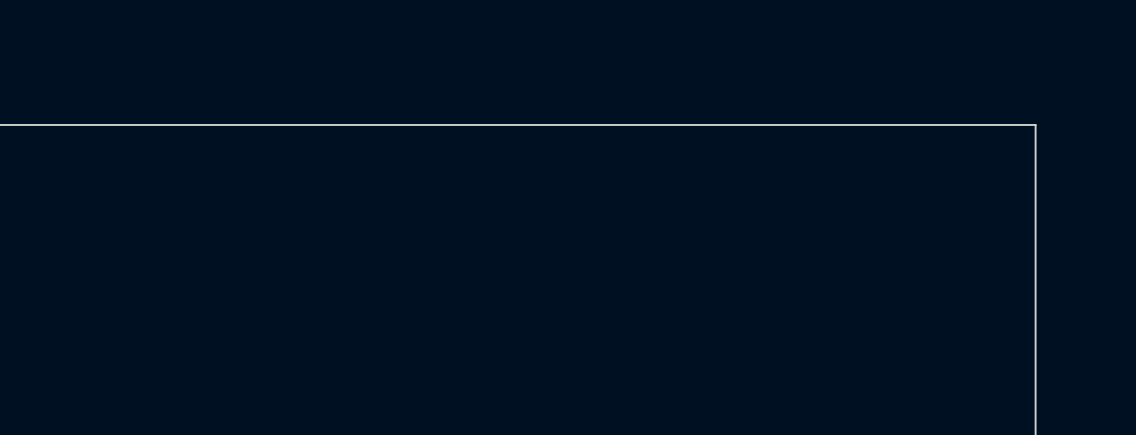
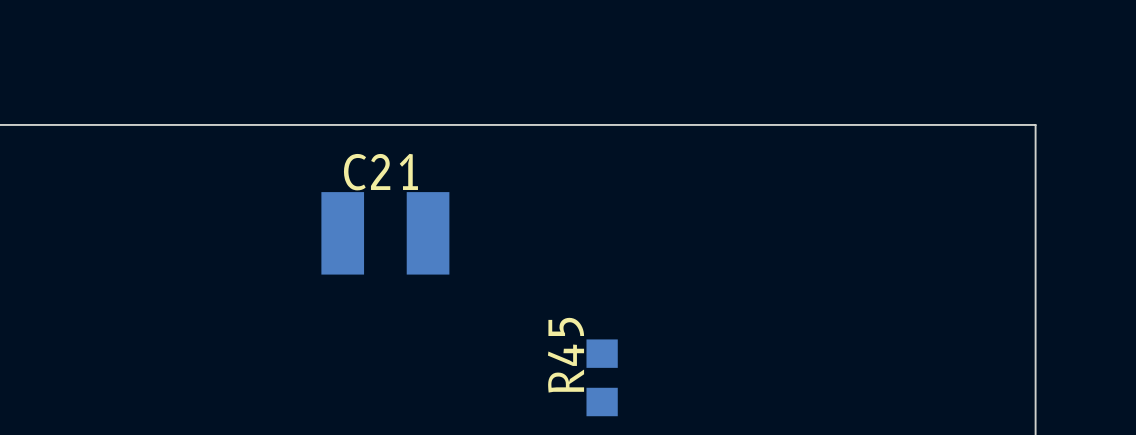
C21: none -> (385, 233)
R45: none -> (602, 377)

